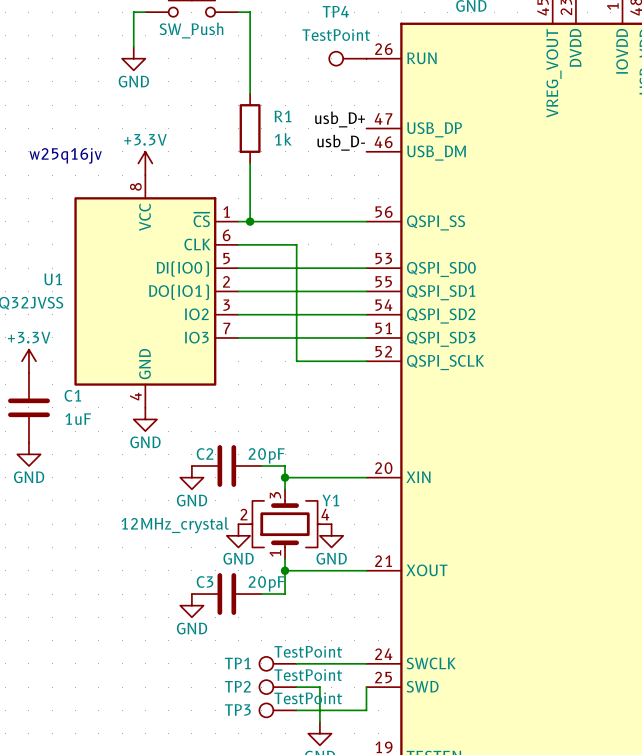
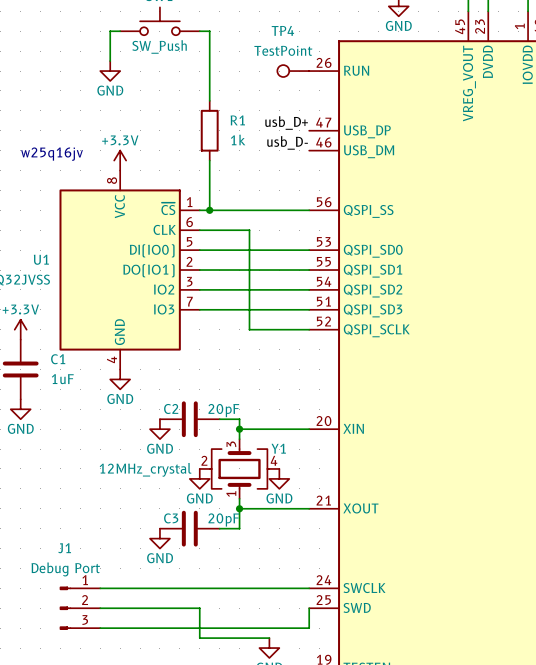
wire: none -> (100, 588) (249, 588)
TP1: TestPoint (278, 663) -> none
J1: none -> Debug Port (80, 608)
TP2: TestPoint (278, 687) -> none
wire: (296, 687) (319, 687) (319, 722) -> (100, 608) (199, 608) (199, 638) (269, 638)
wire: none -> (100, 628) (249, 628)
TP3: TestPoint (278, 710) -> none

